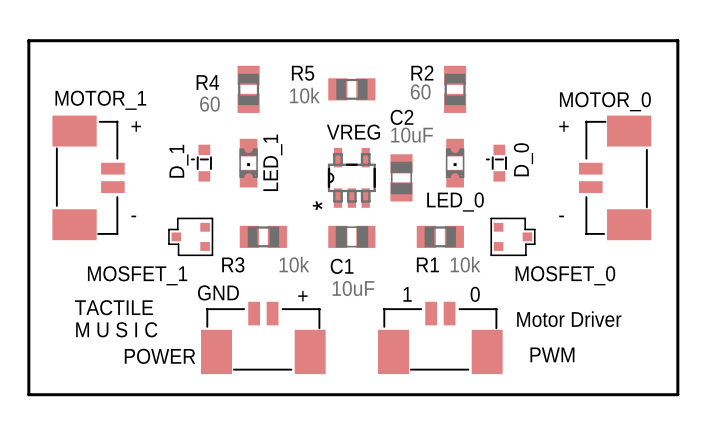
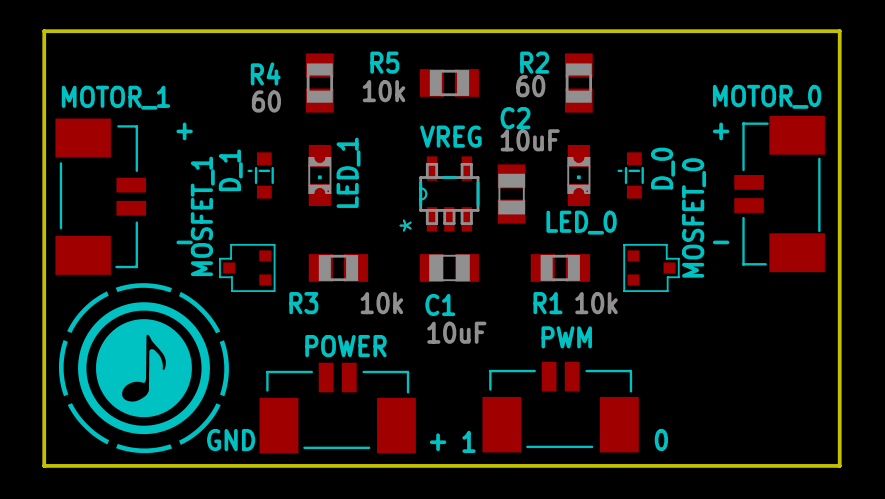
board edge: (28, 48) (28, 40) (677, 40) (677, 394) (663, 394) -> (44, 31) (839, 31) (839, 465)
MOTOR_1 footprint: [52, 115, 125, 241] -> [55, 118, 147, 275]
drawing: none -> [58, 283, 229, 454]
MOSFET_1 name rotation: 0° (137, 275) -> 90° counterclockwise (202, 216)
MOSFET_0 name rotation: 0° (565, 275) -> 90° counterclockwise (694, 217)
text position: GND (218, 292) -> GND (231, 440)
text position: 1 (407, 294) -> 1 (468, 441)
text position: 0 (475, 294) -> 0 (661, 440)
text position: + (302, 296) -> + (438, 442)
POWER footprint: [201, 301, 326, 375] -> [259, 362, 416, 454]
PWM footprint: [378, 301, 503, 375] -> [482, 361, 639, 453]
text: TACTILE (114, 307) -> none
text: Motor Driver (569, 319) -> none
text: M U S I C (116, 329) -> none
PWM name position: PWM (552, 354) -> PWM (566, 337)
POWER name position: POWER (160, 356) -> POWER (345, 346)

